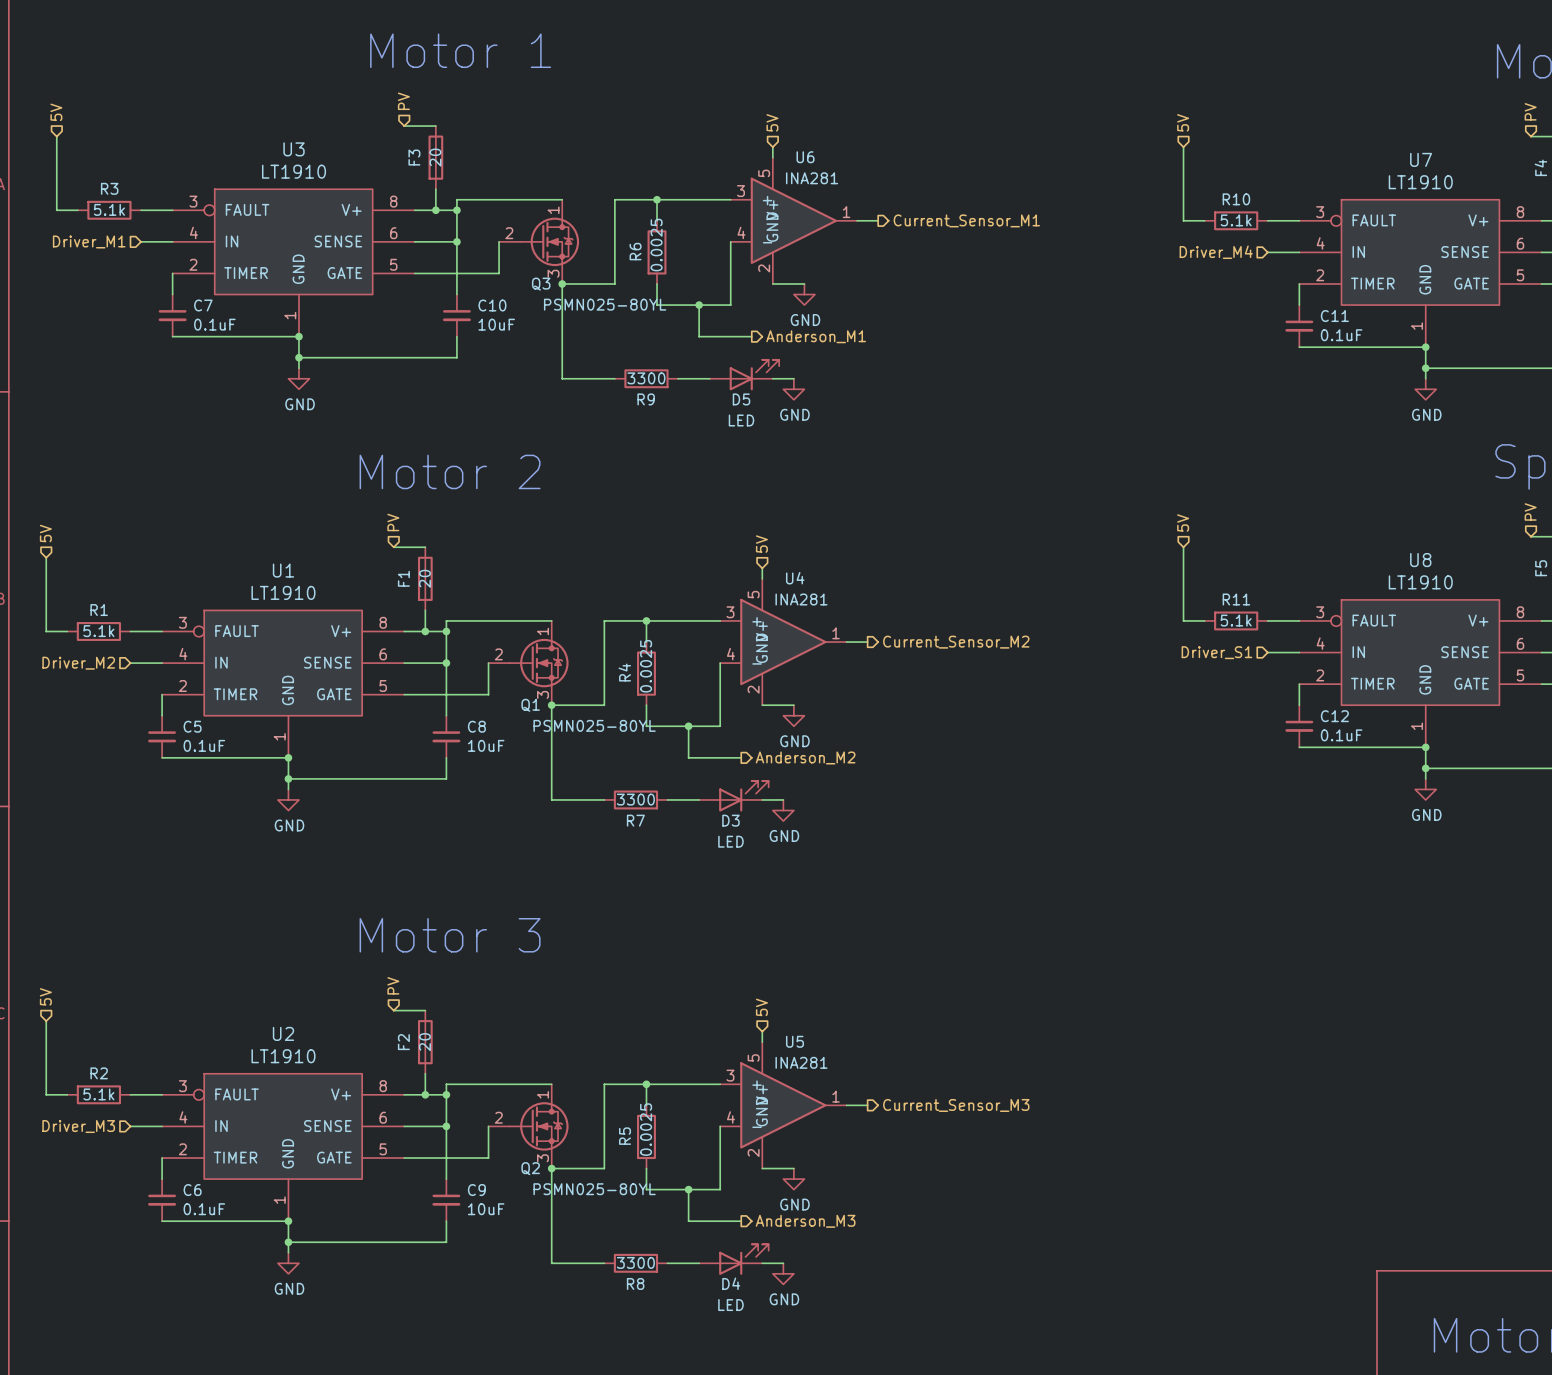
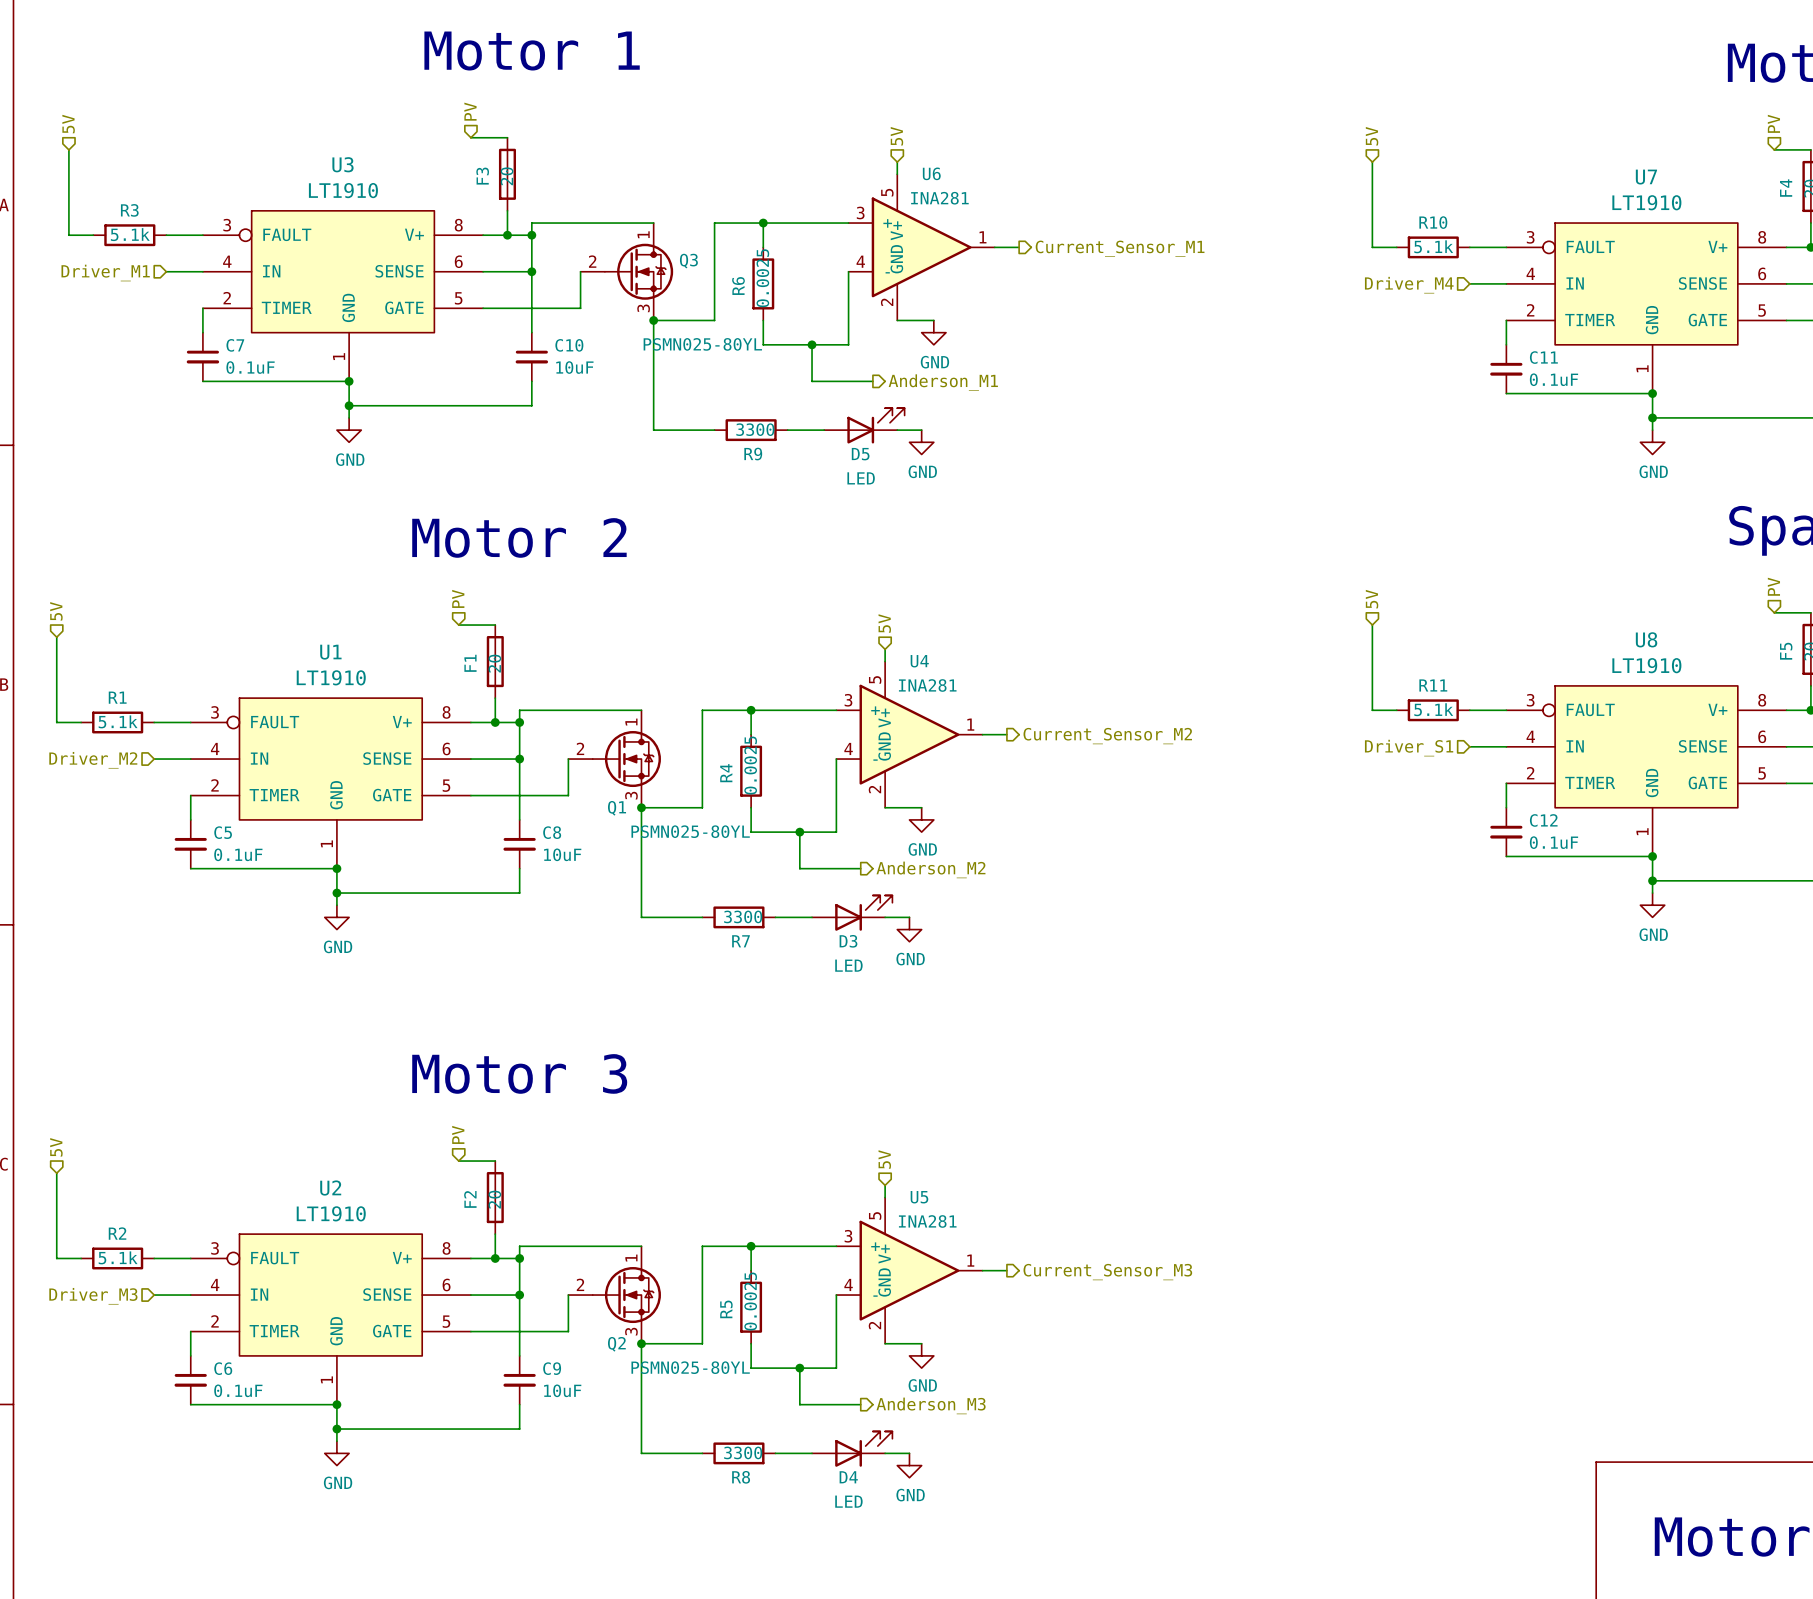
Q3 name position: Q3 (541, 284) -> Q3 (688, 261)

